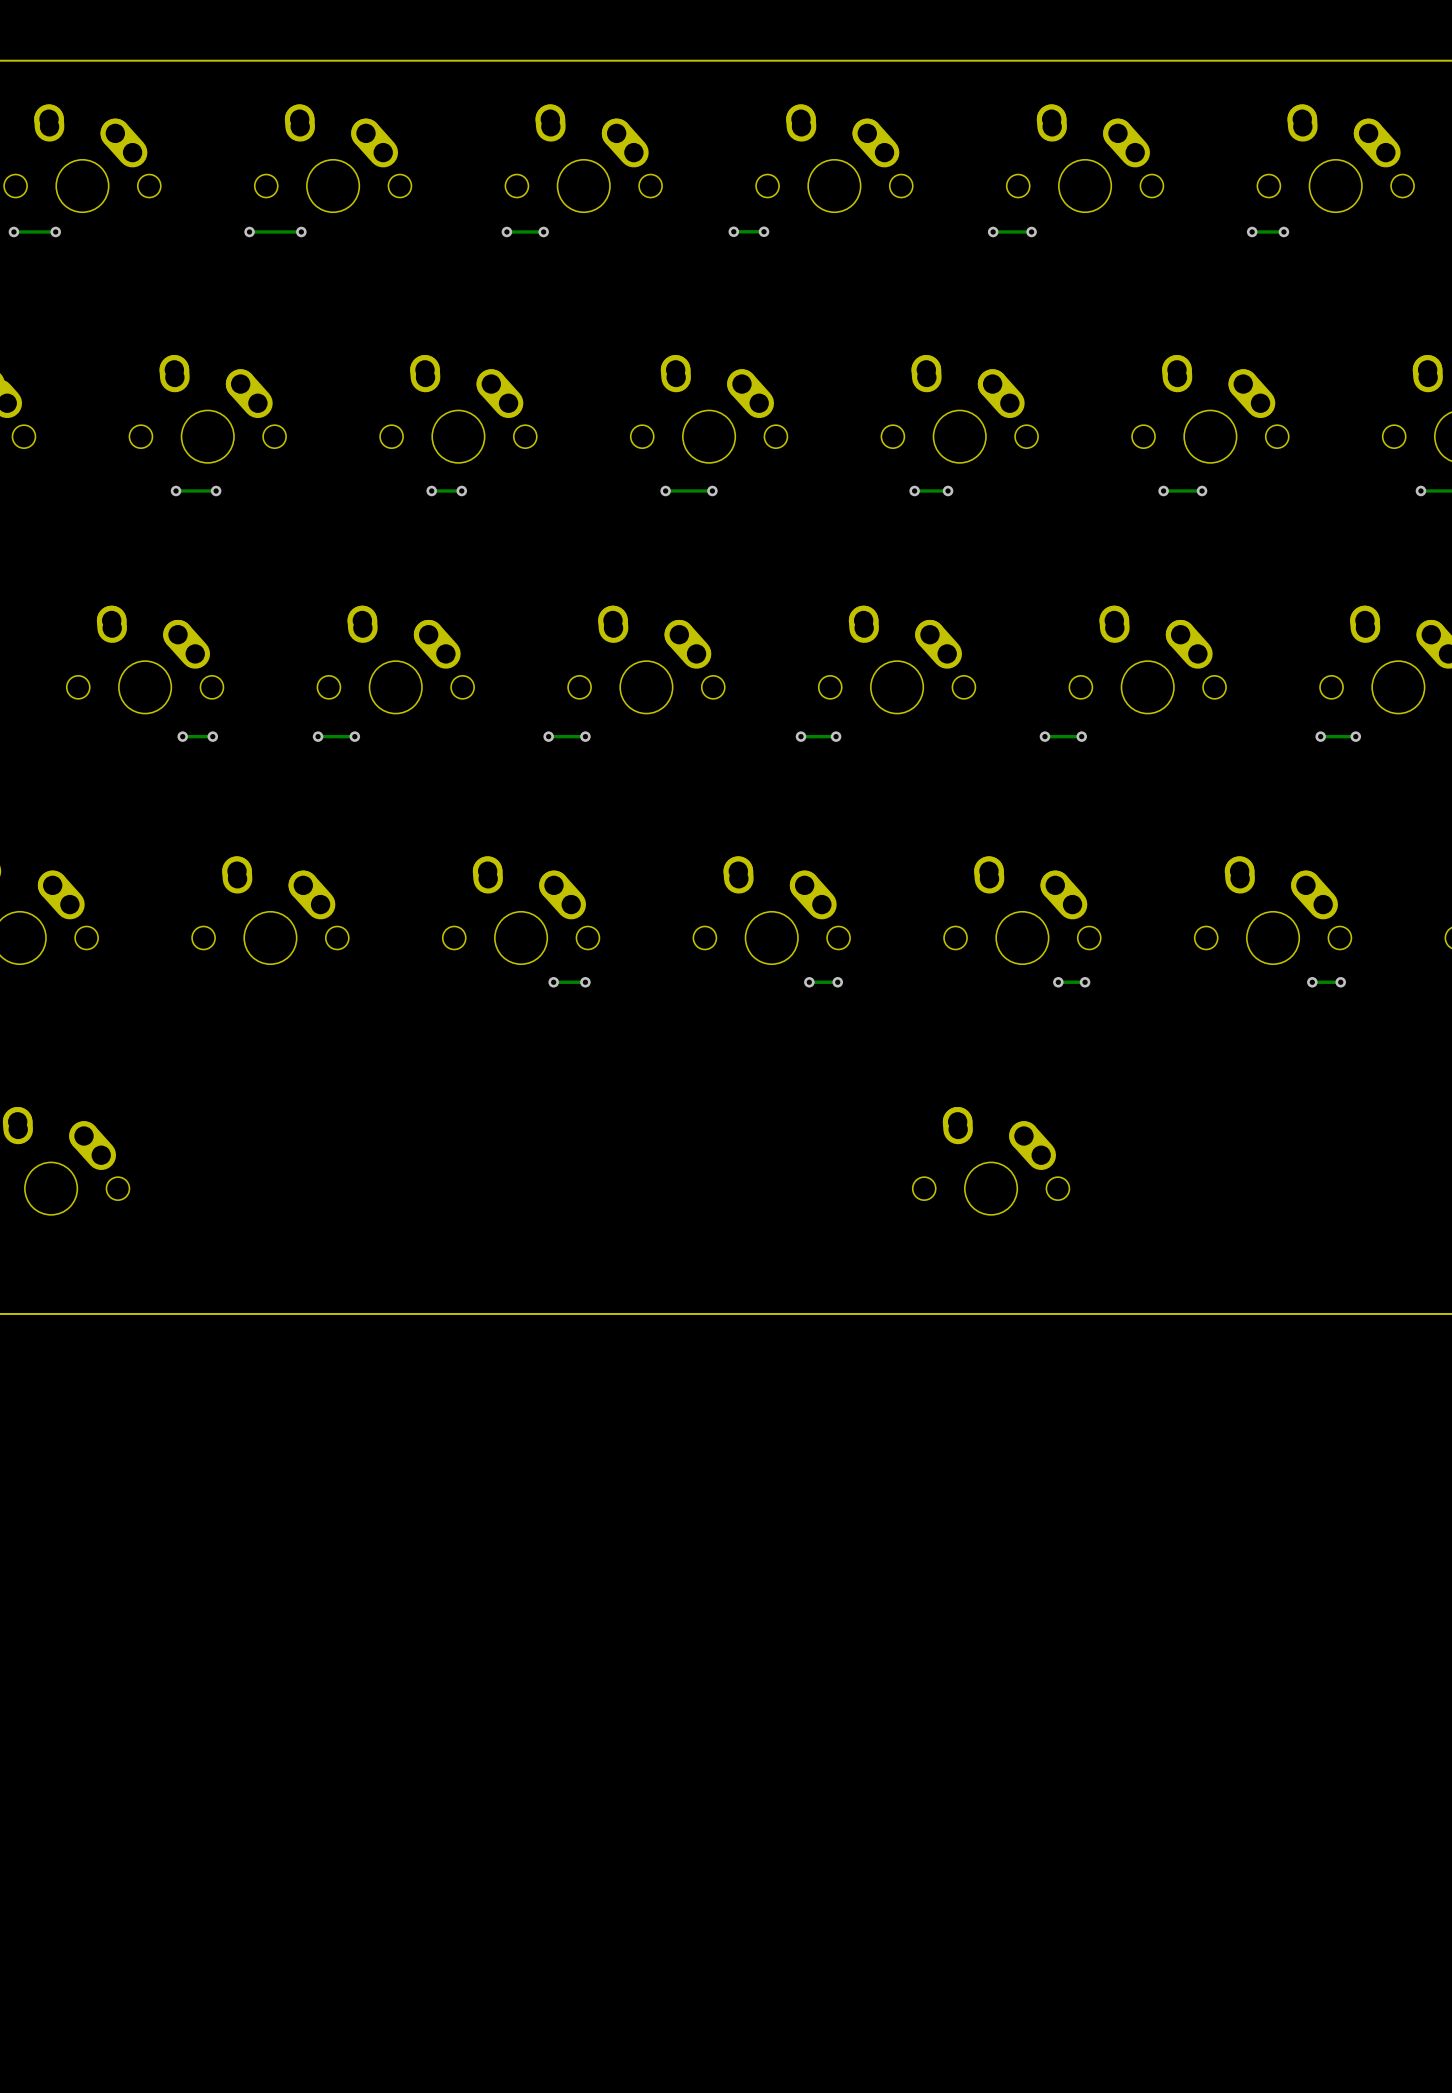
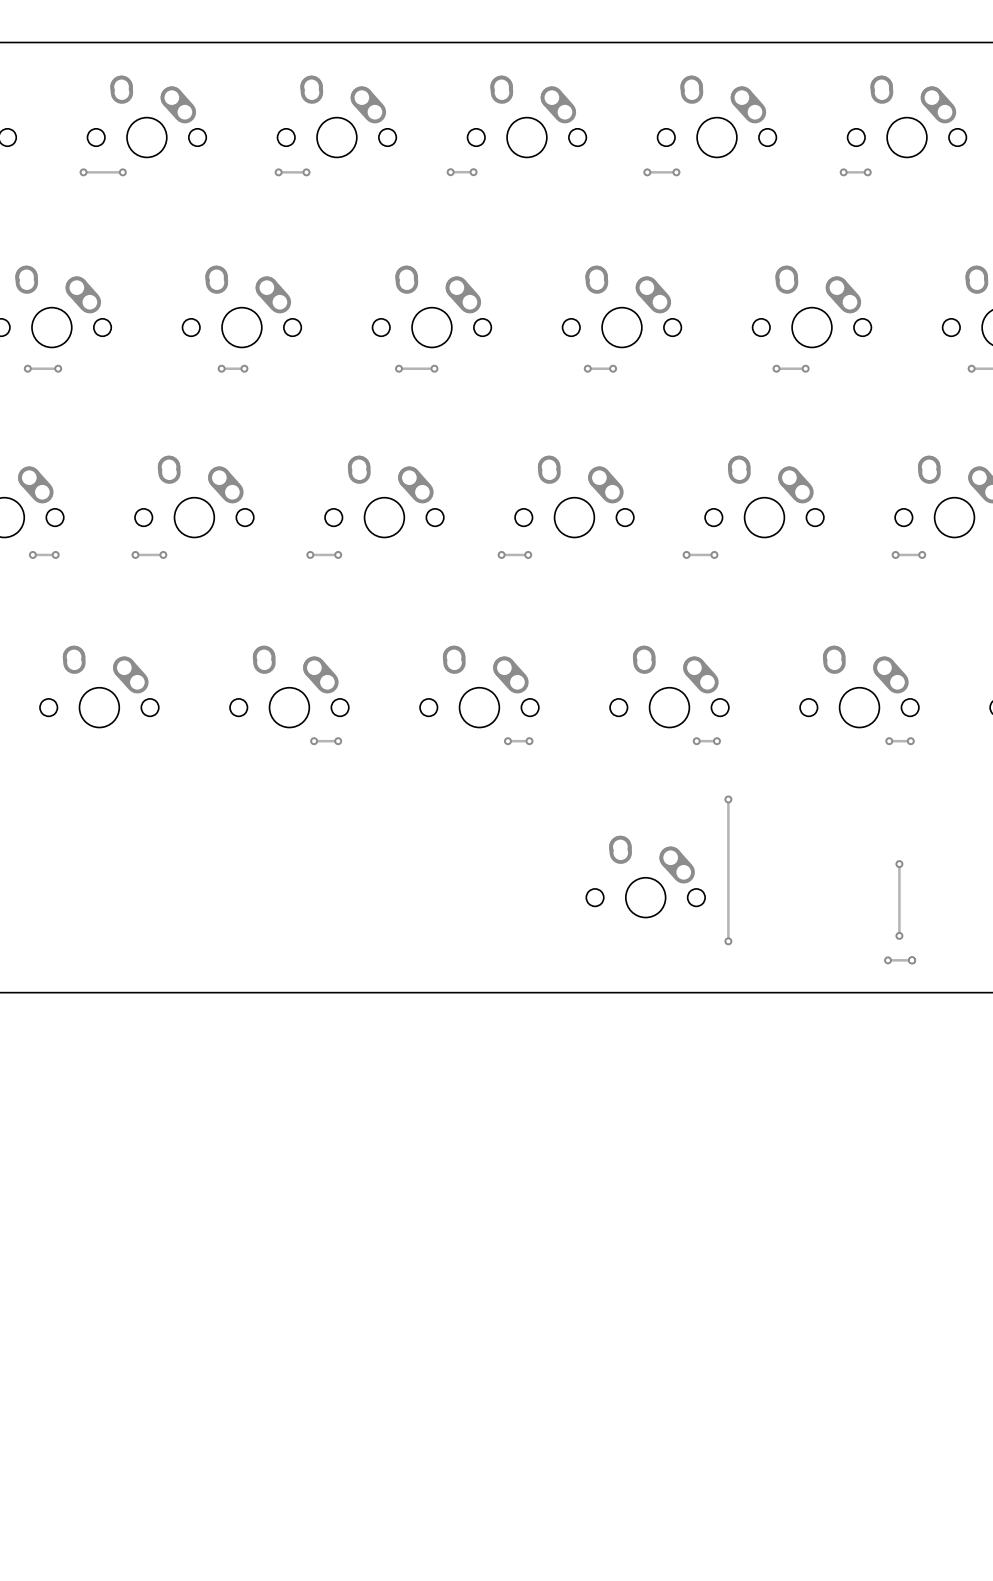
track: none -> (728, 799) (728, 941)
via: none -> (728, 799)
track: none -> (899, 864) (899, 935)
via: none -> (899, 864)
via: none -> (899, 935)
via: none -> (728, 941)
via: none -> (888, 960)
track: none -> (912, 960) (888, 960)
via: none -> (912, 960)

